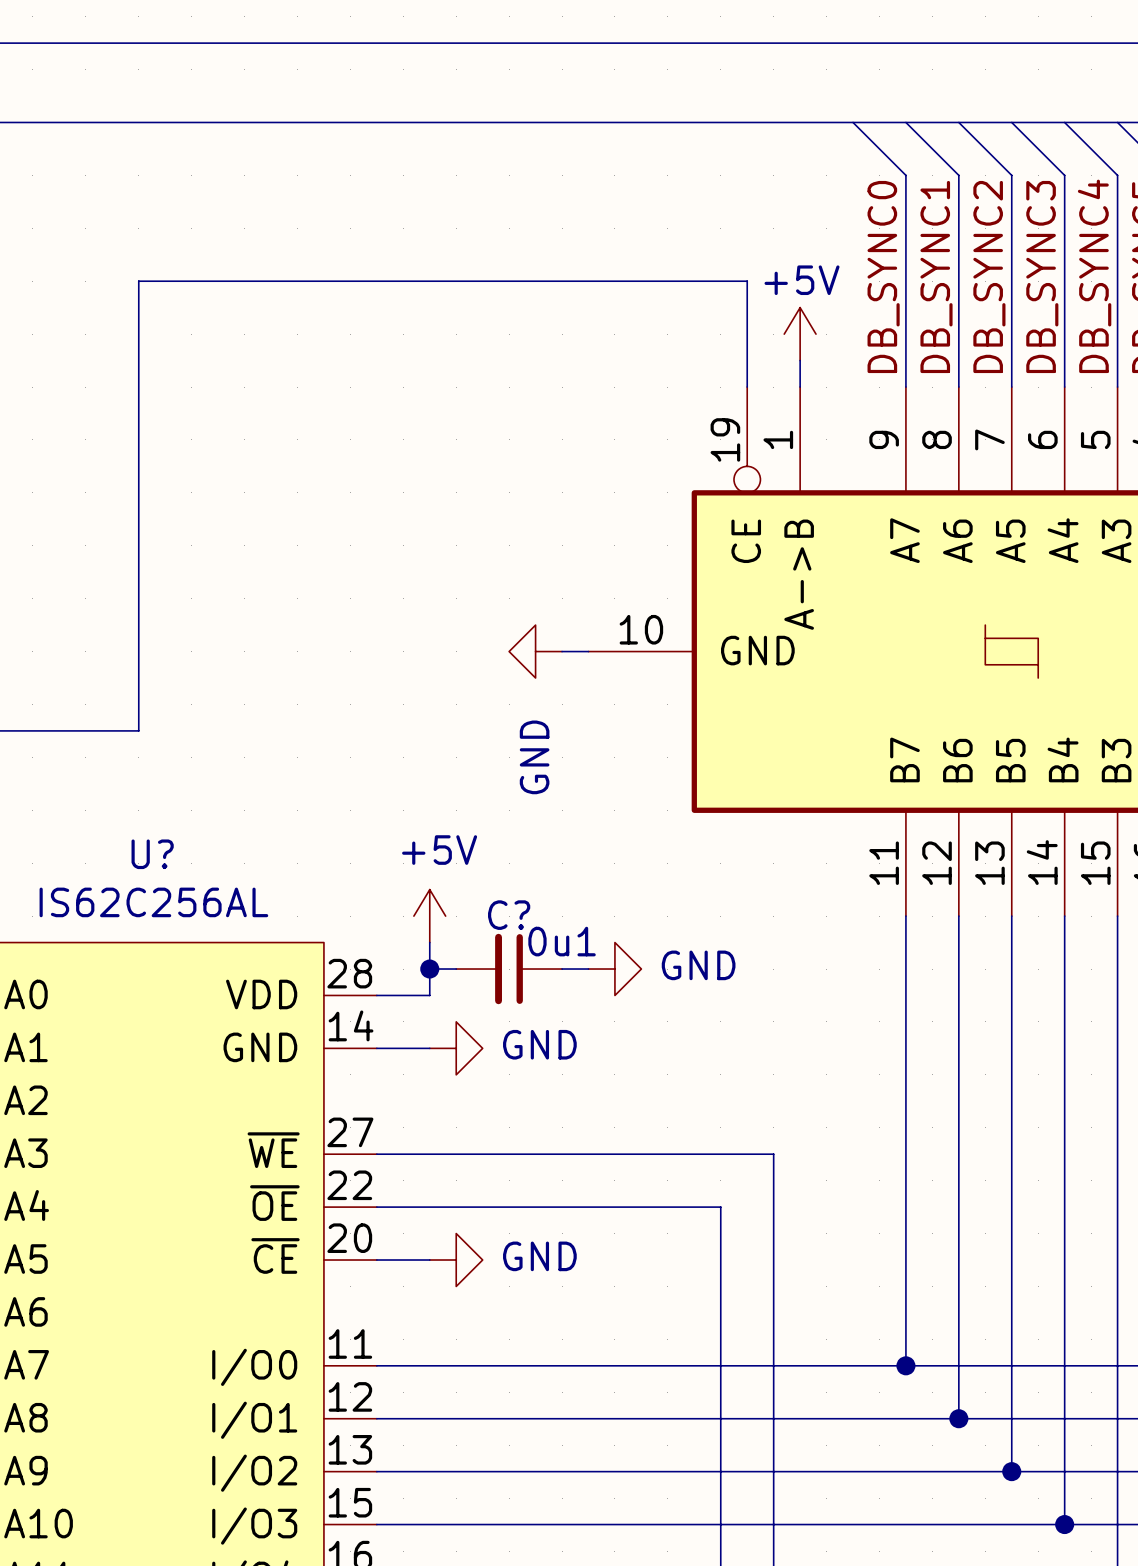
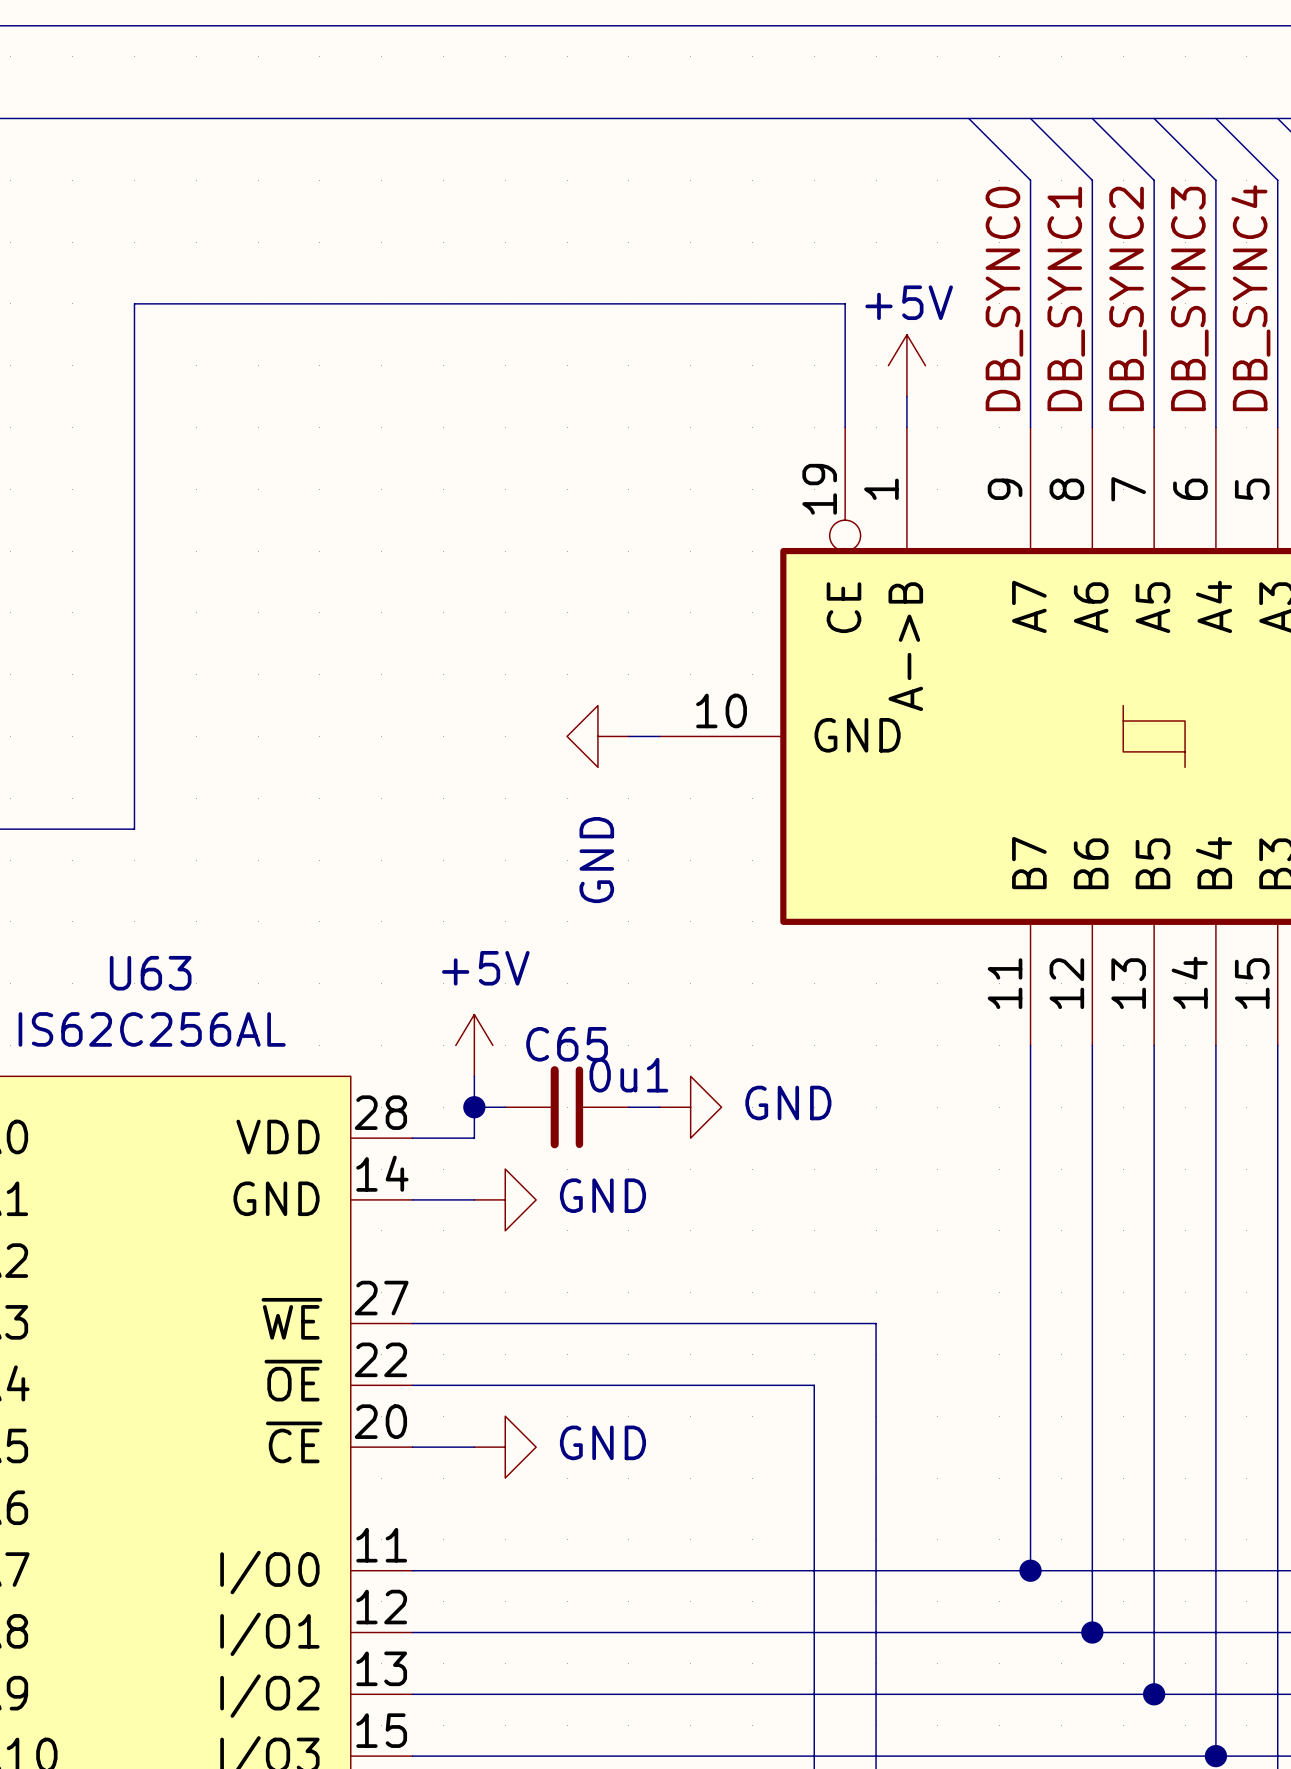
U? name: U? (152, 854) -> U63 (150, 973)
C? name: C? (509, 915) -> C65 (567, 1044)

